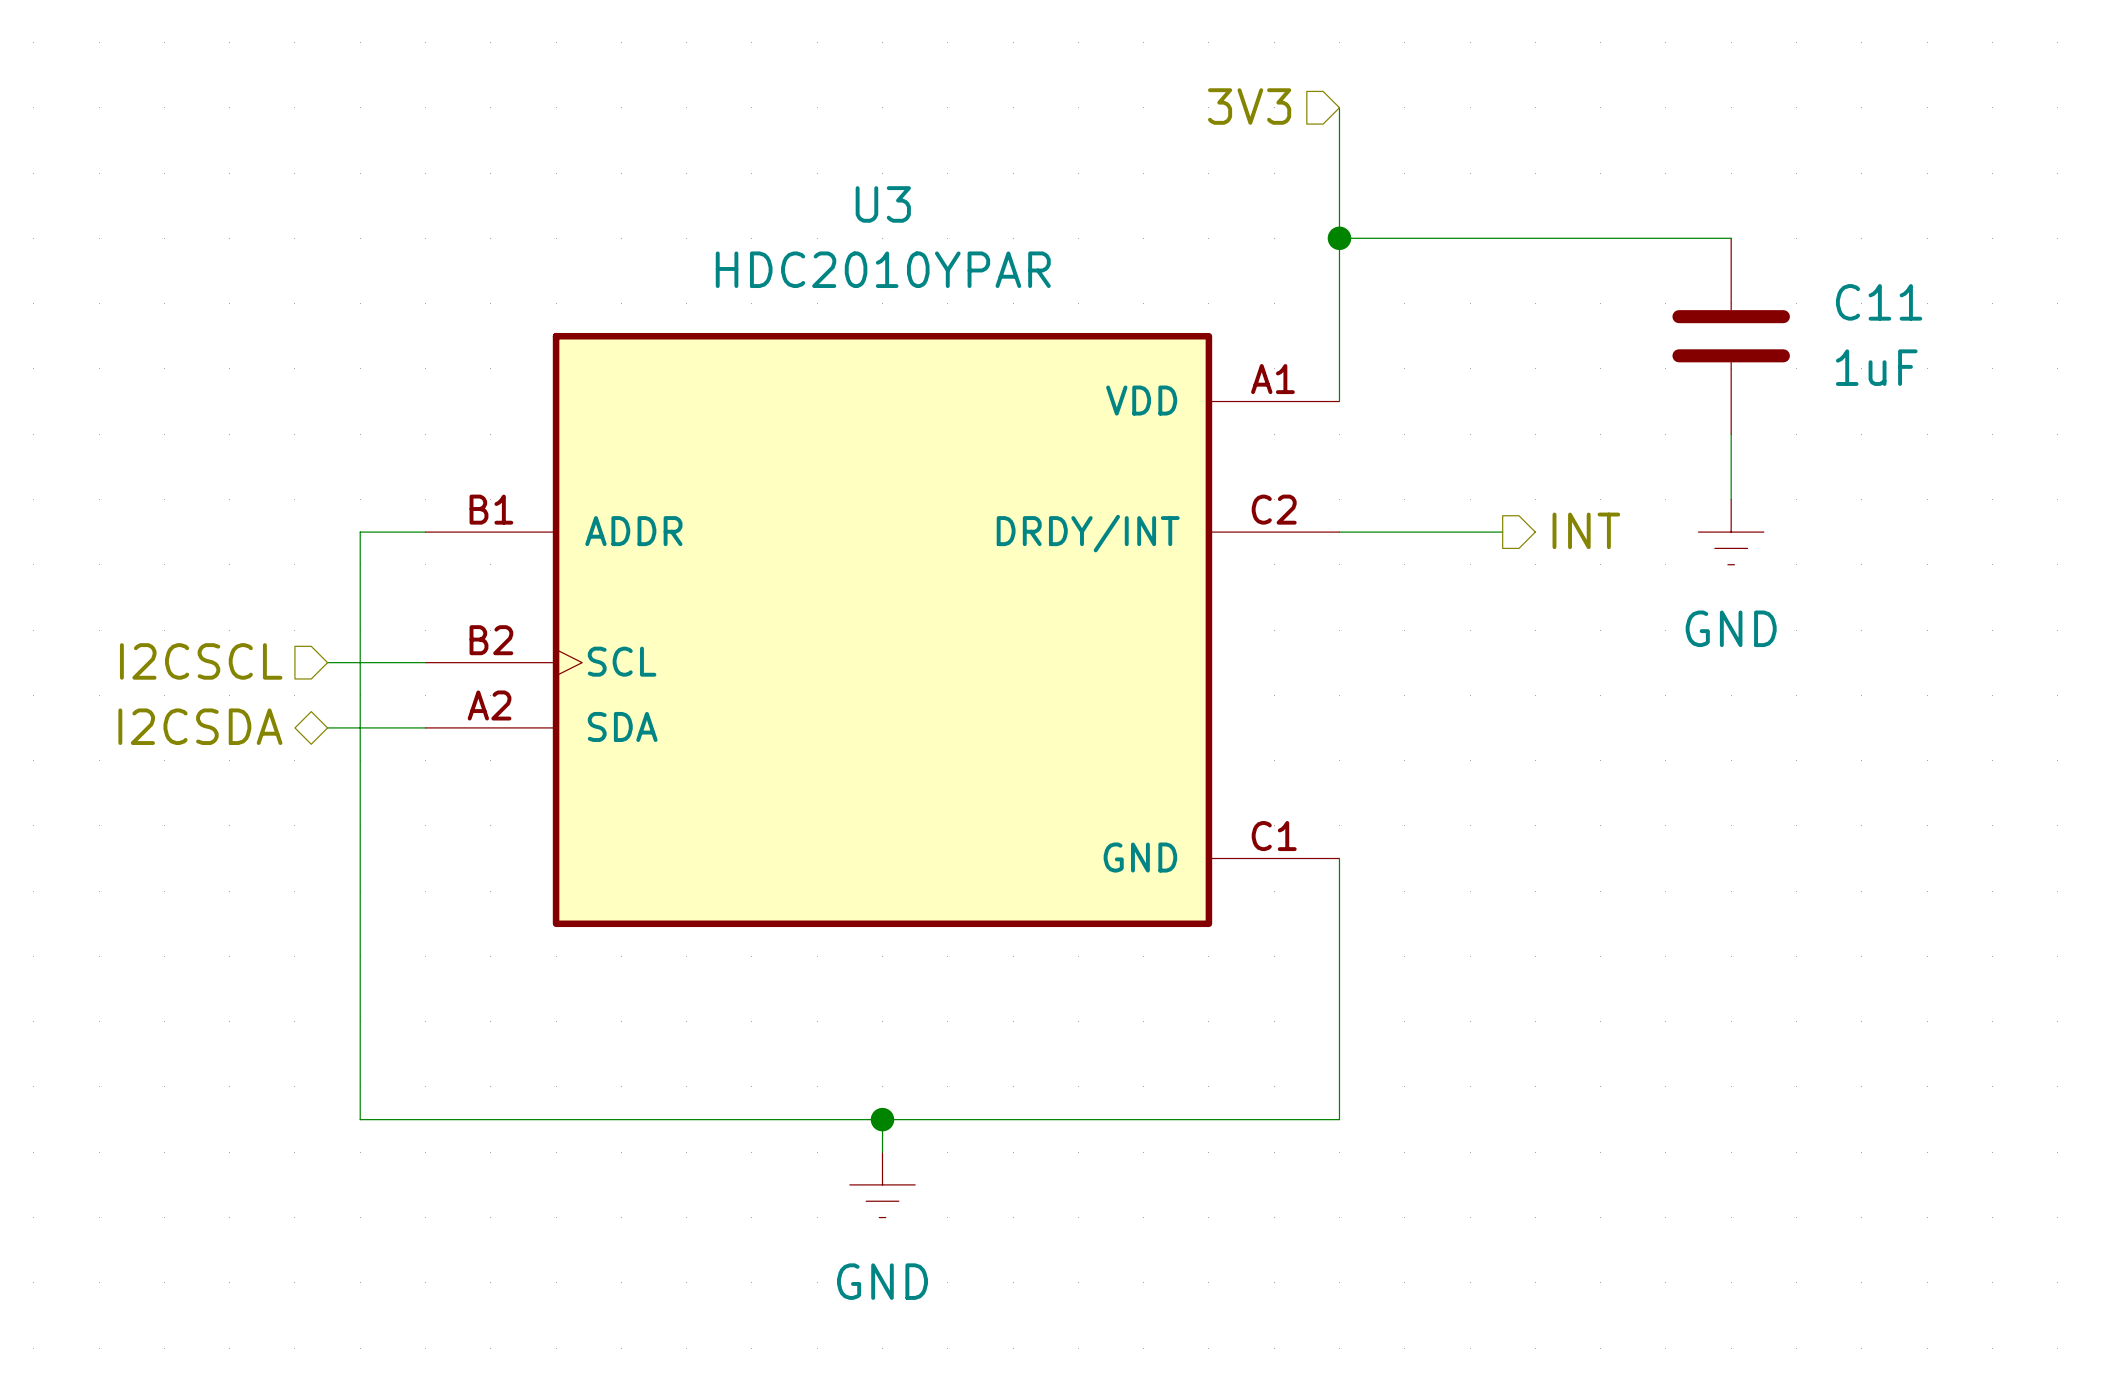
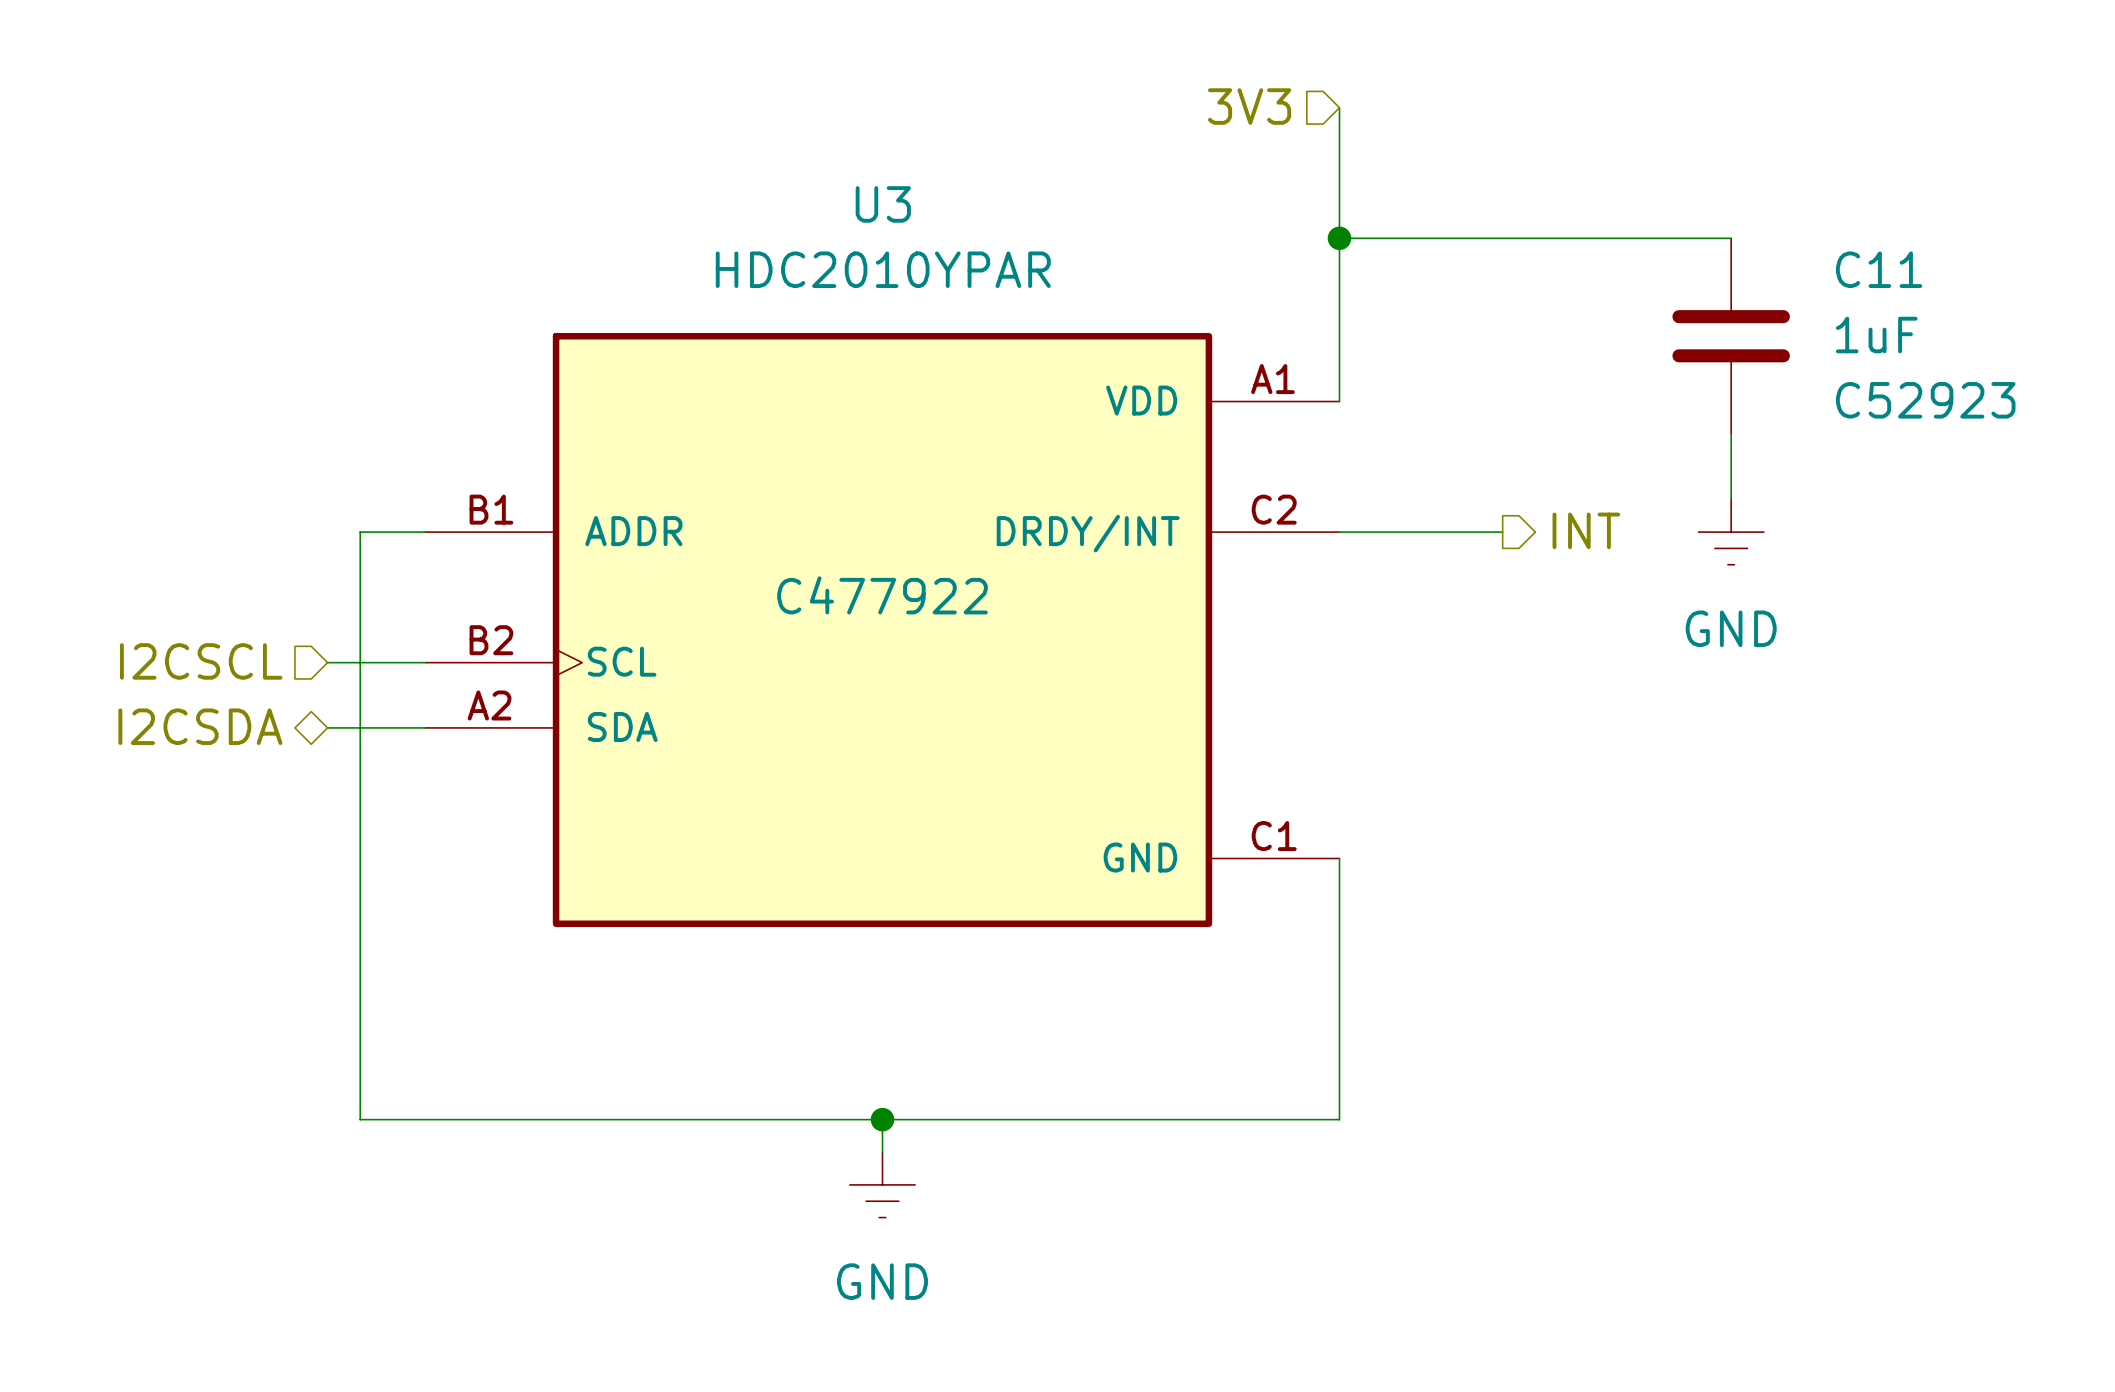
C11 name position: C11 (1879, 302) -> C11 (1879, 269)
C11 value position: 1uF (1876, 367) -> 1uF (1876, 335)
C11 text: none -> C52923 (1925, 400)
U3 text: none -> C477922 (882, 595)

